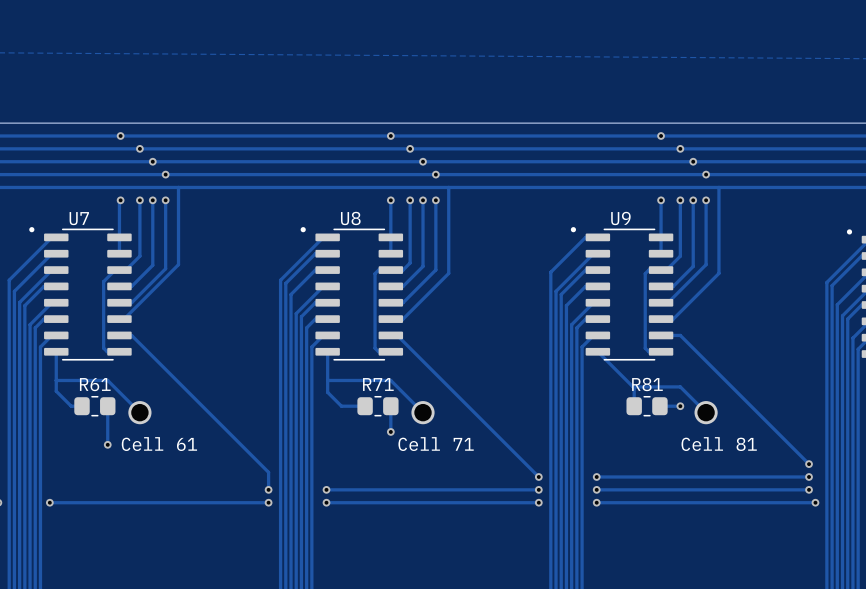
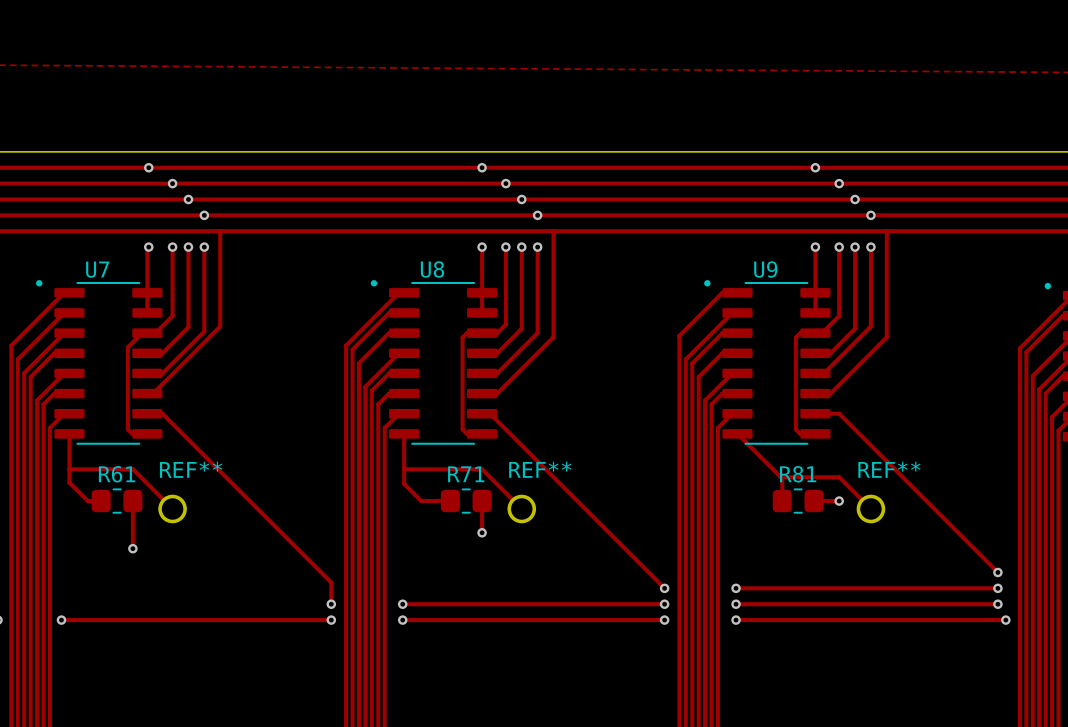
Cell 61 name: Cell 61 (159, 444) -> REF** (191, 469)
Cell 71 name: Cell 71 (436, 444) -> REF** (540, 469)
Cell 81 name: Cell 81 (719, 444) -> REF** (889, 469)

